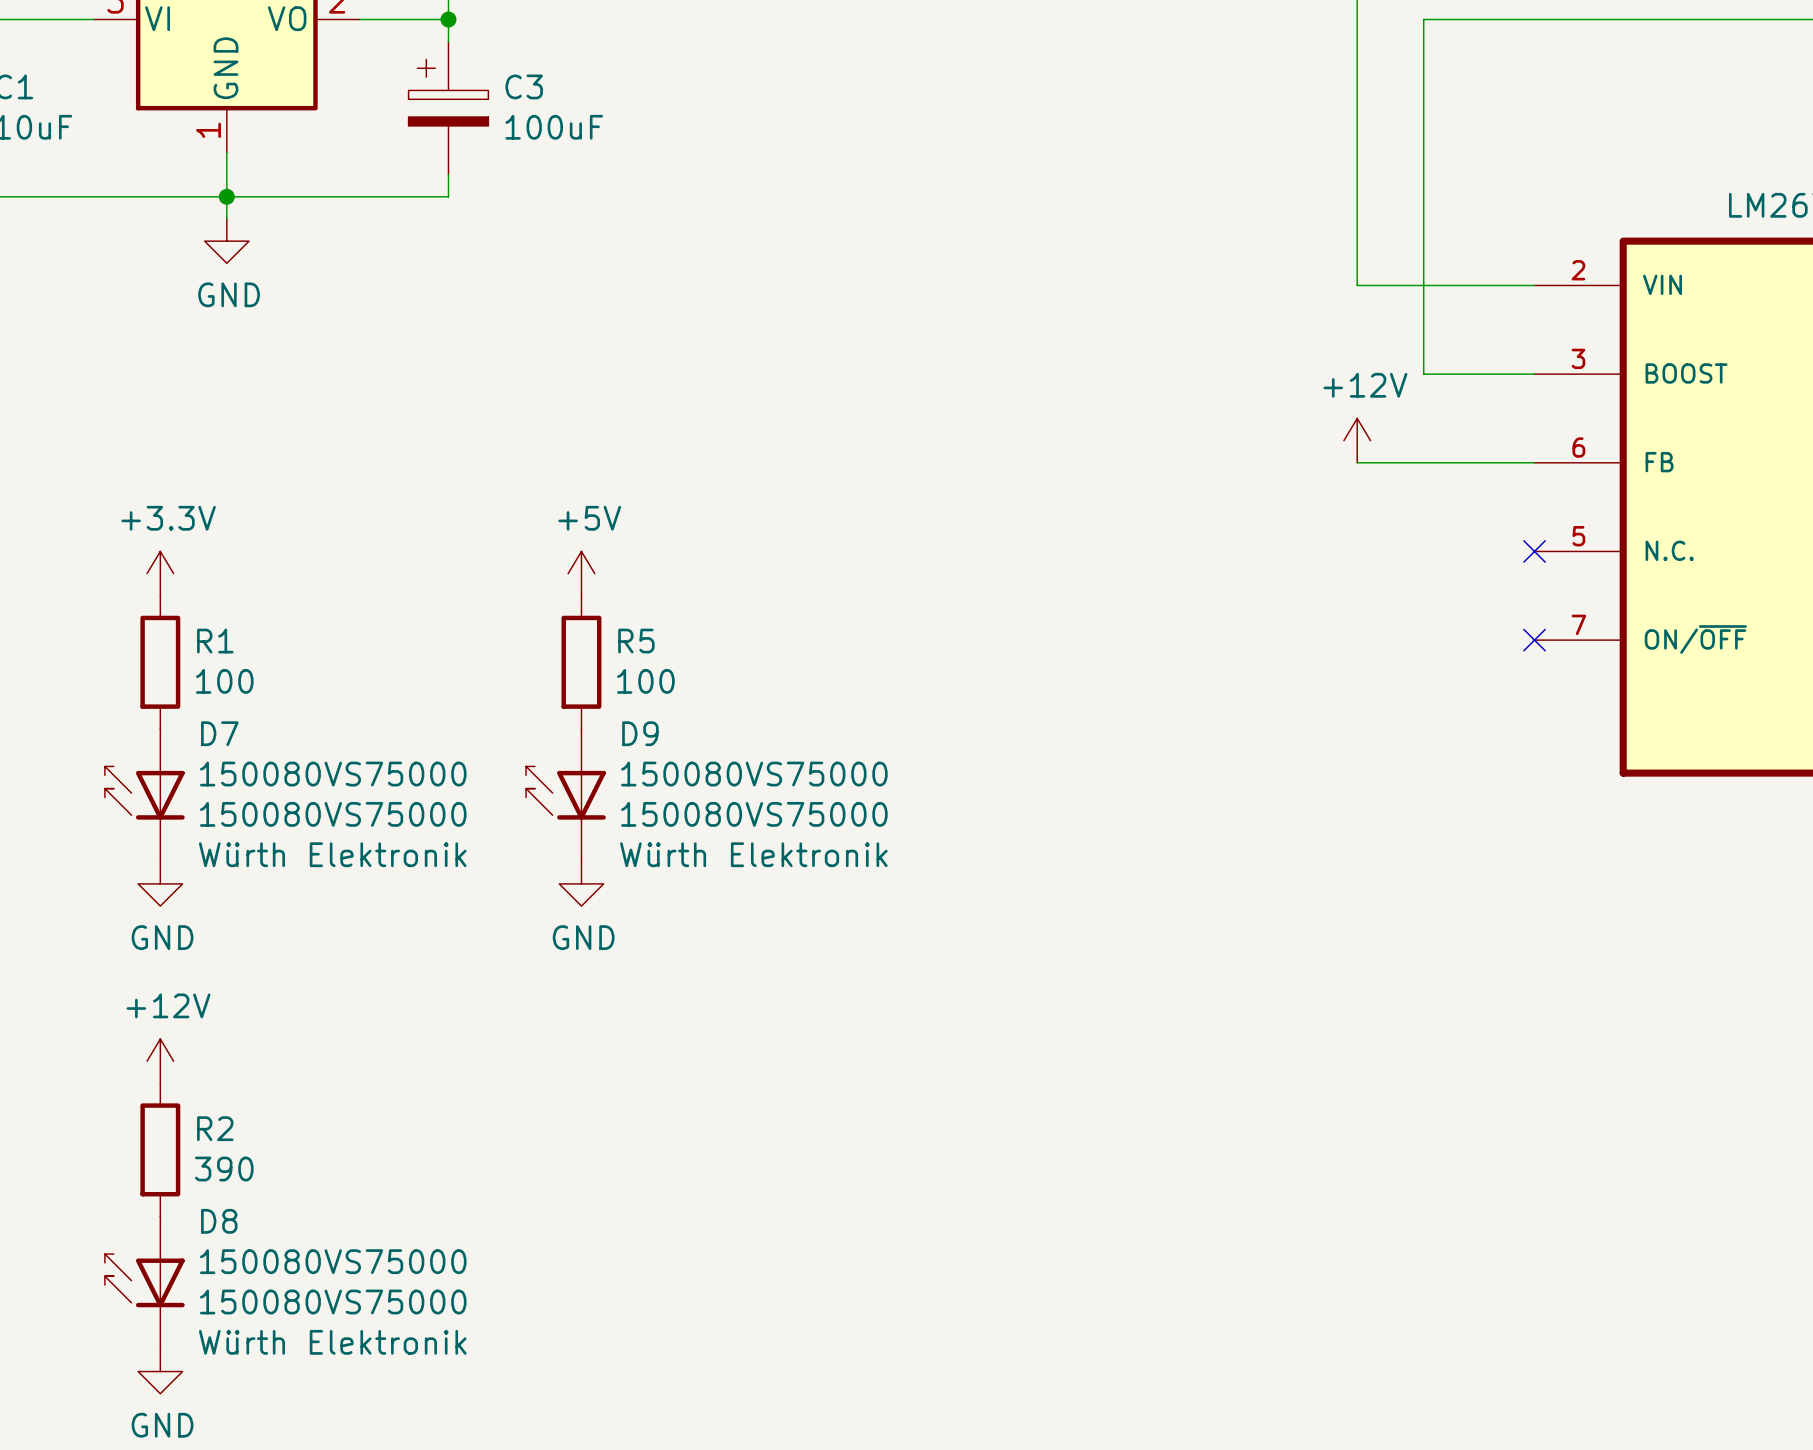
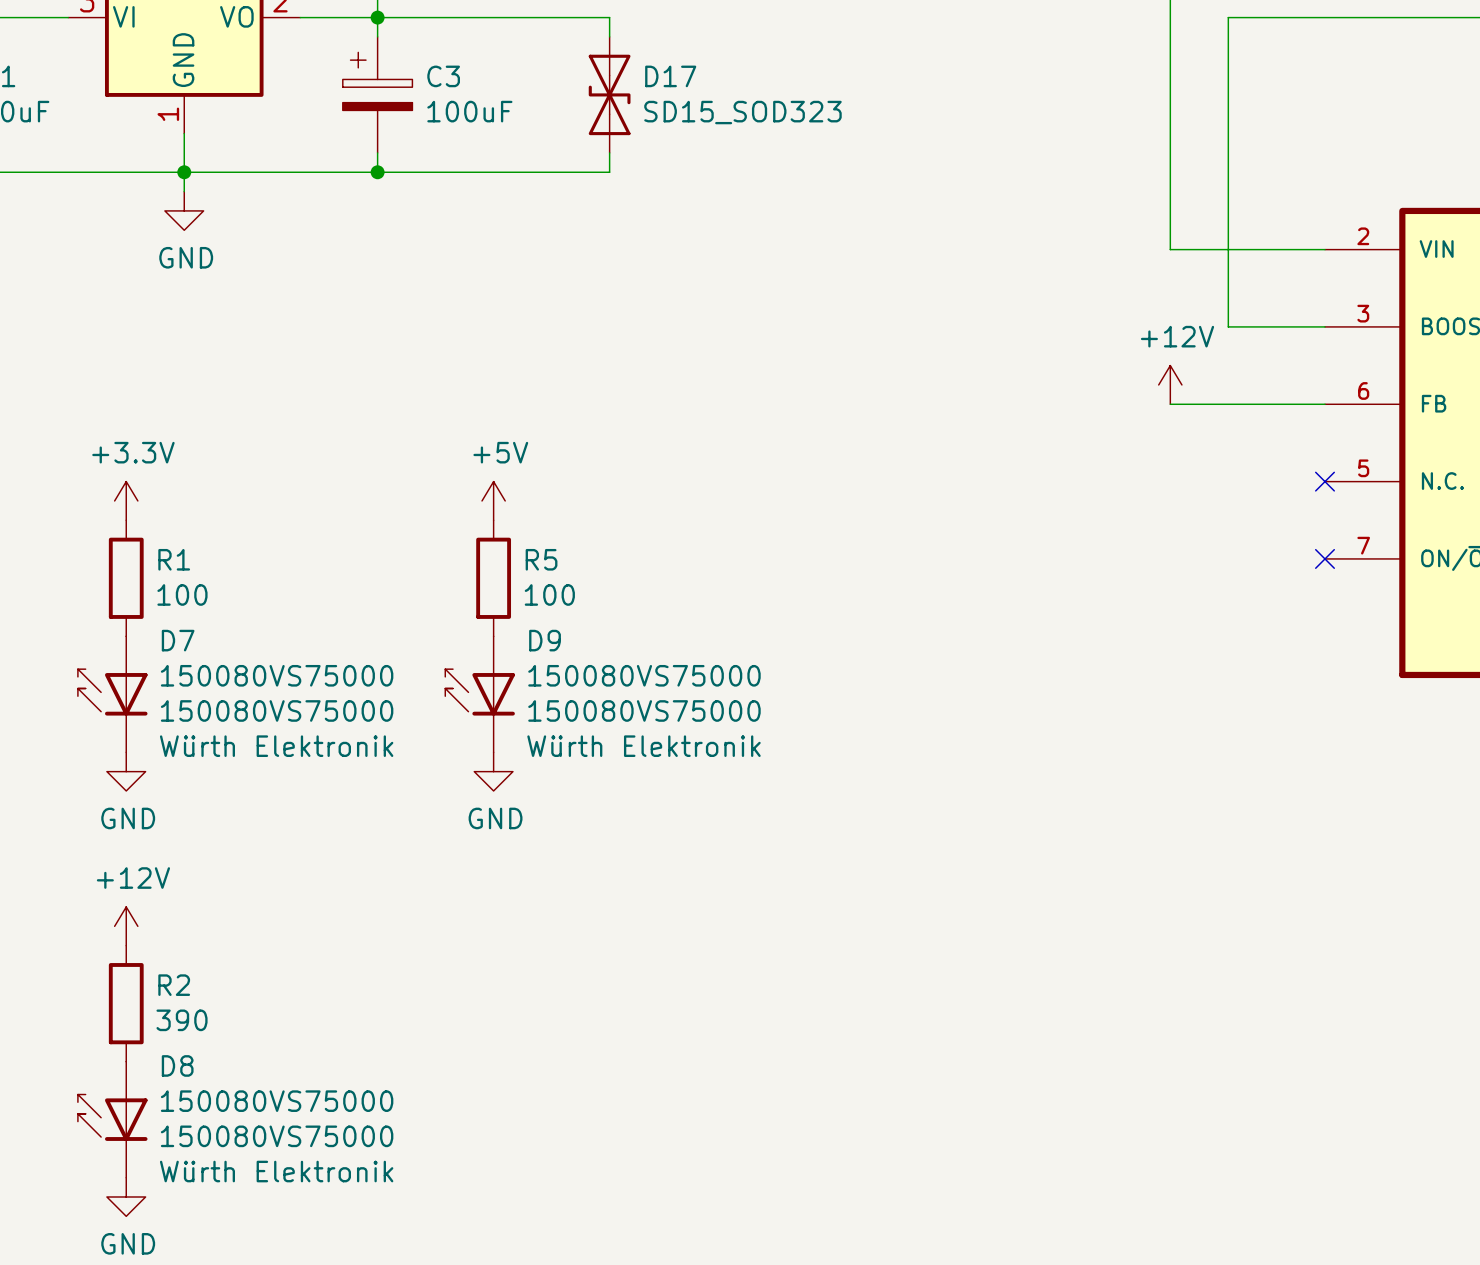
wire: none -> (377, 17) (609, 17) (609, 36)
D17: none -> SD15_SOD323 (609, 94)
wire: none -> (609, 152) (609, 172) (377, 172)
junction: none -> (377, 172)

